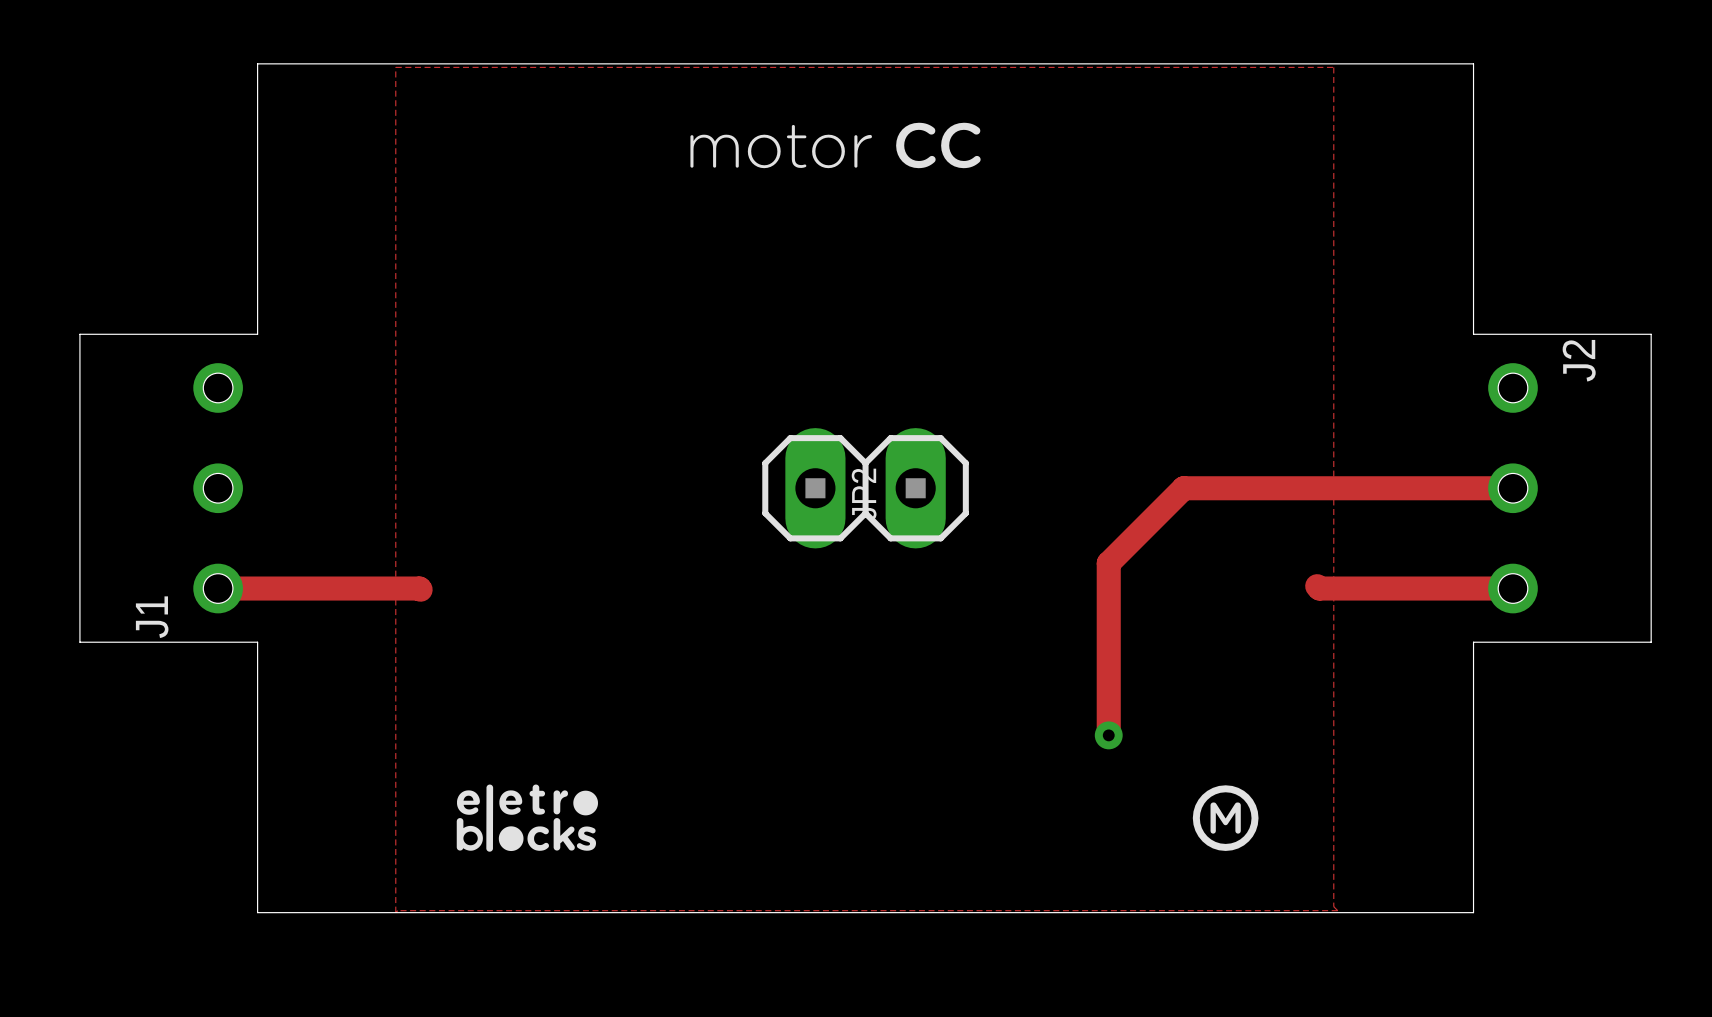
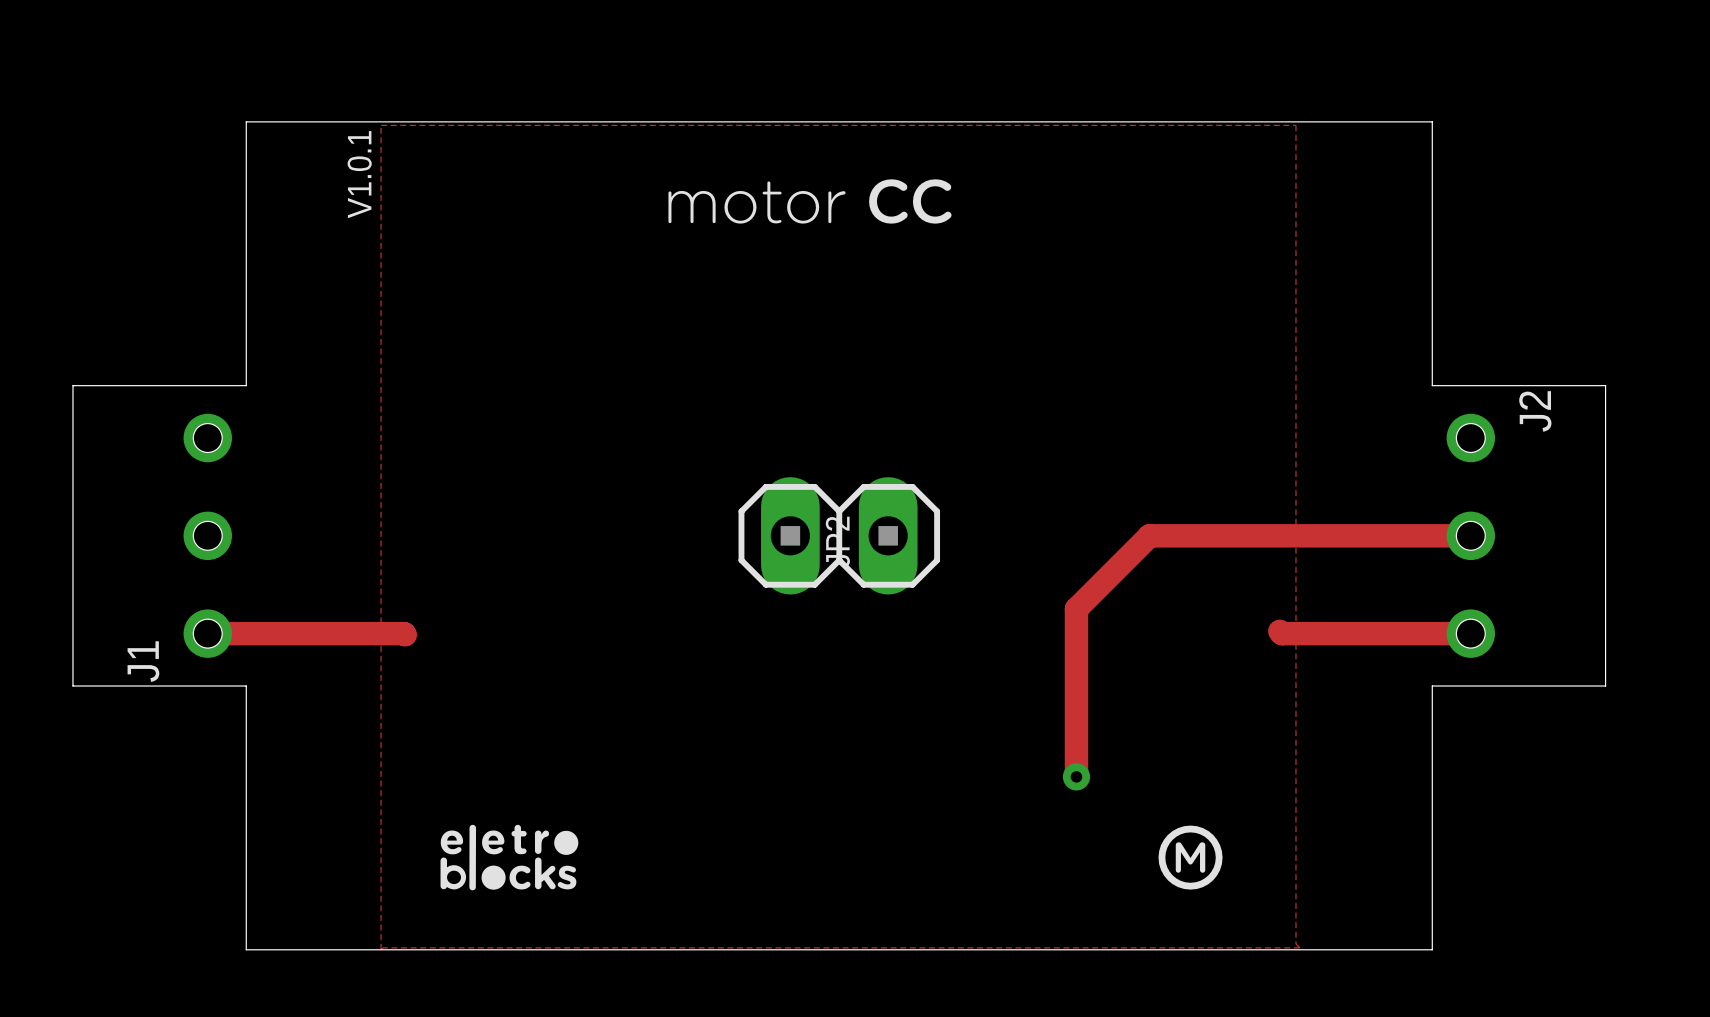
text: none -> V1.0.1 (359, 174)

